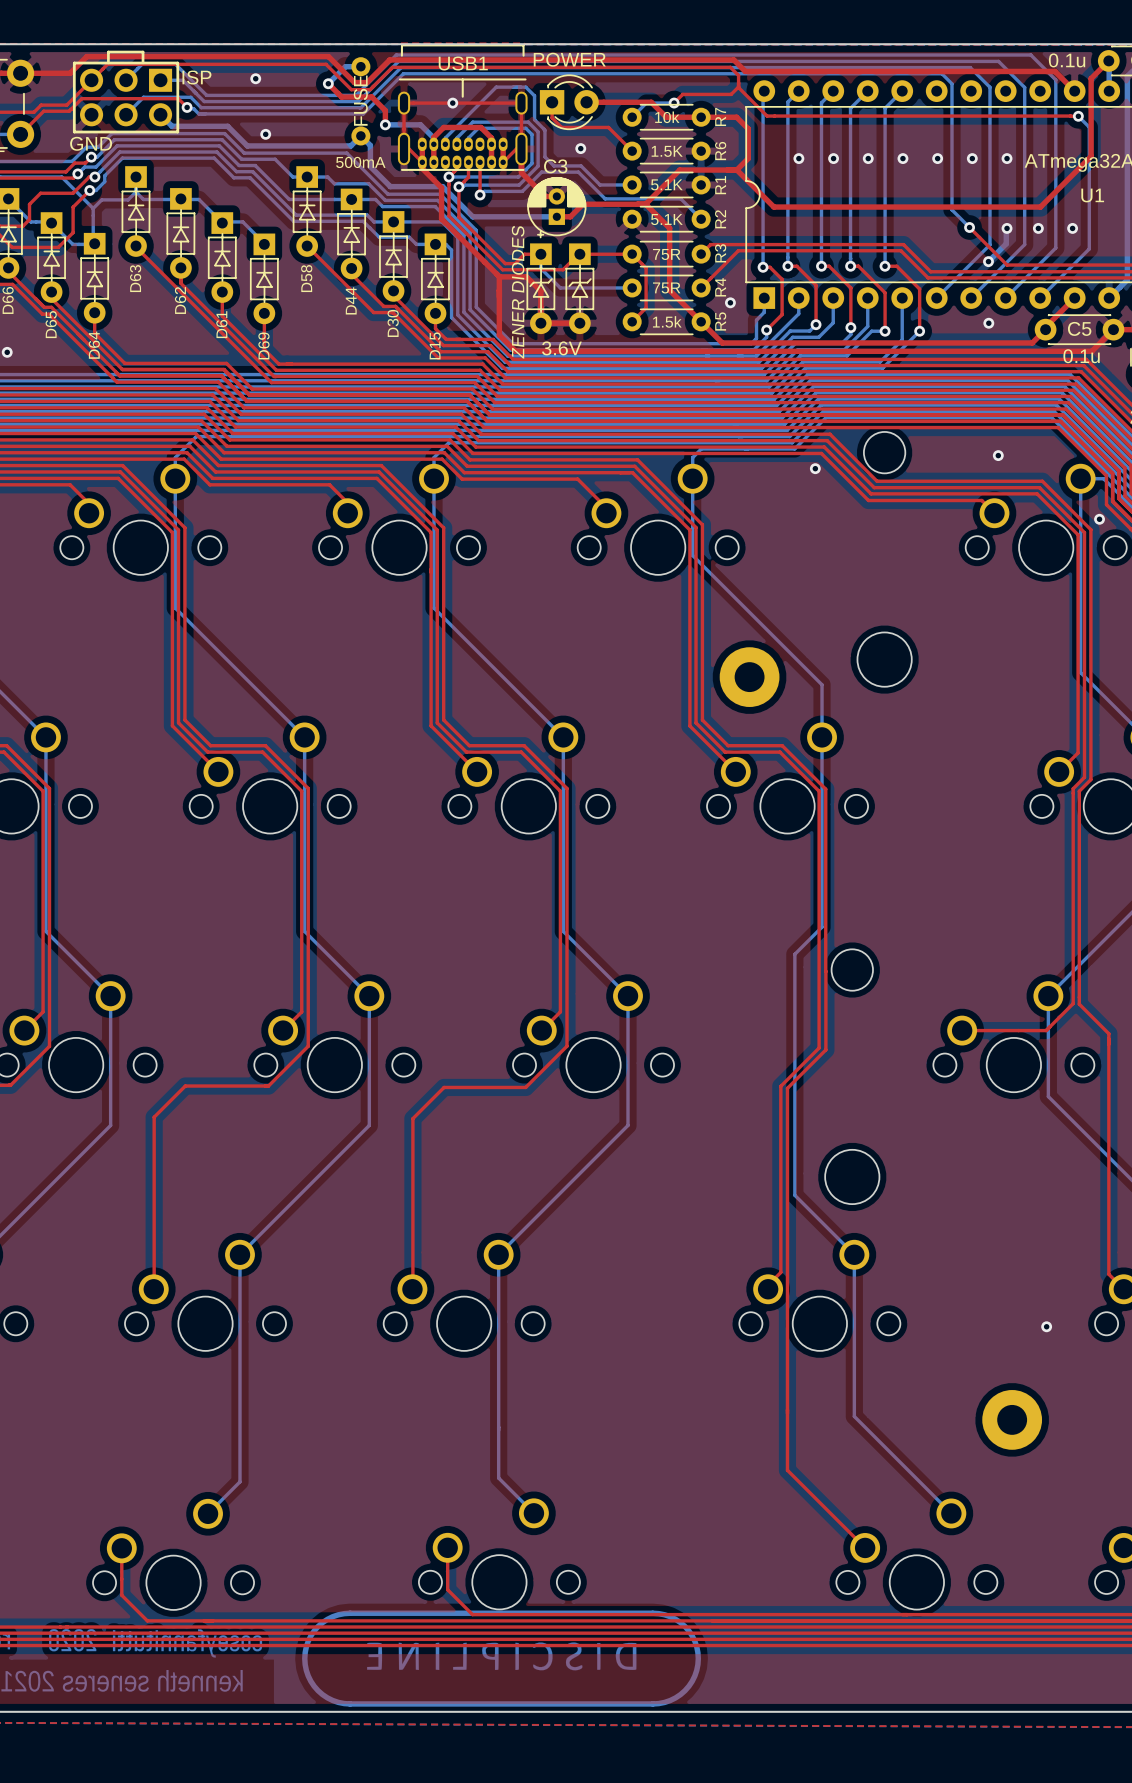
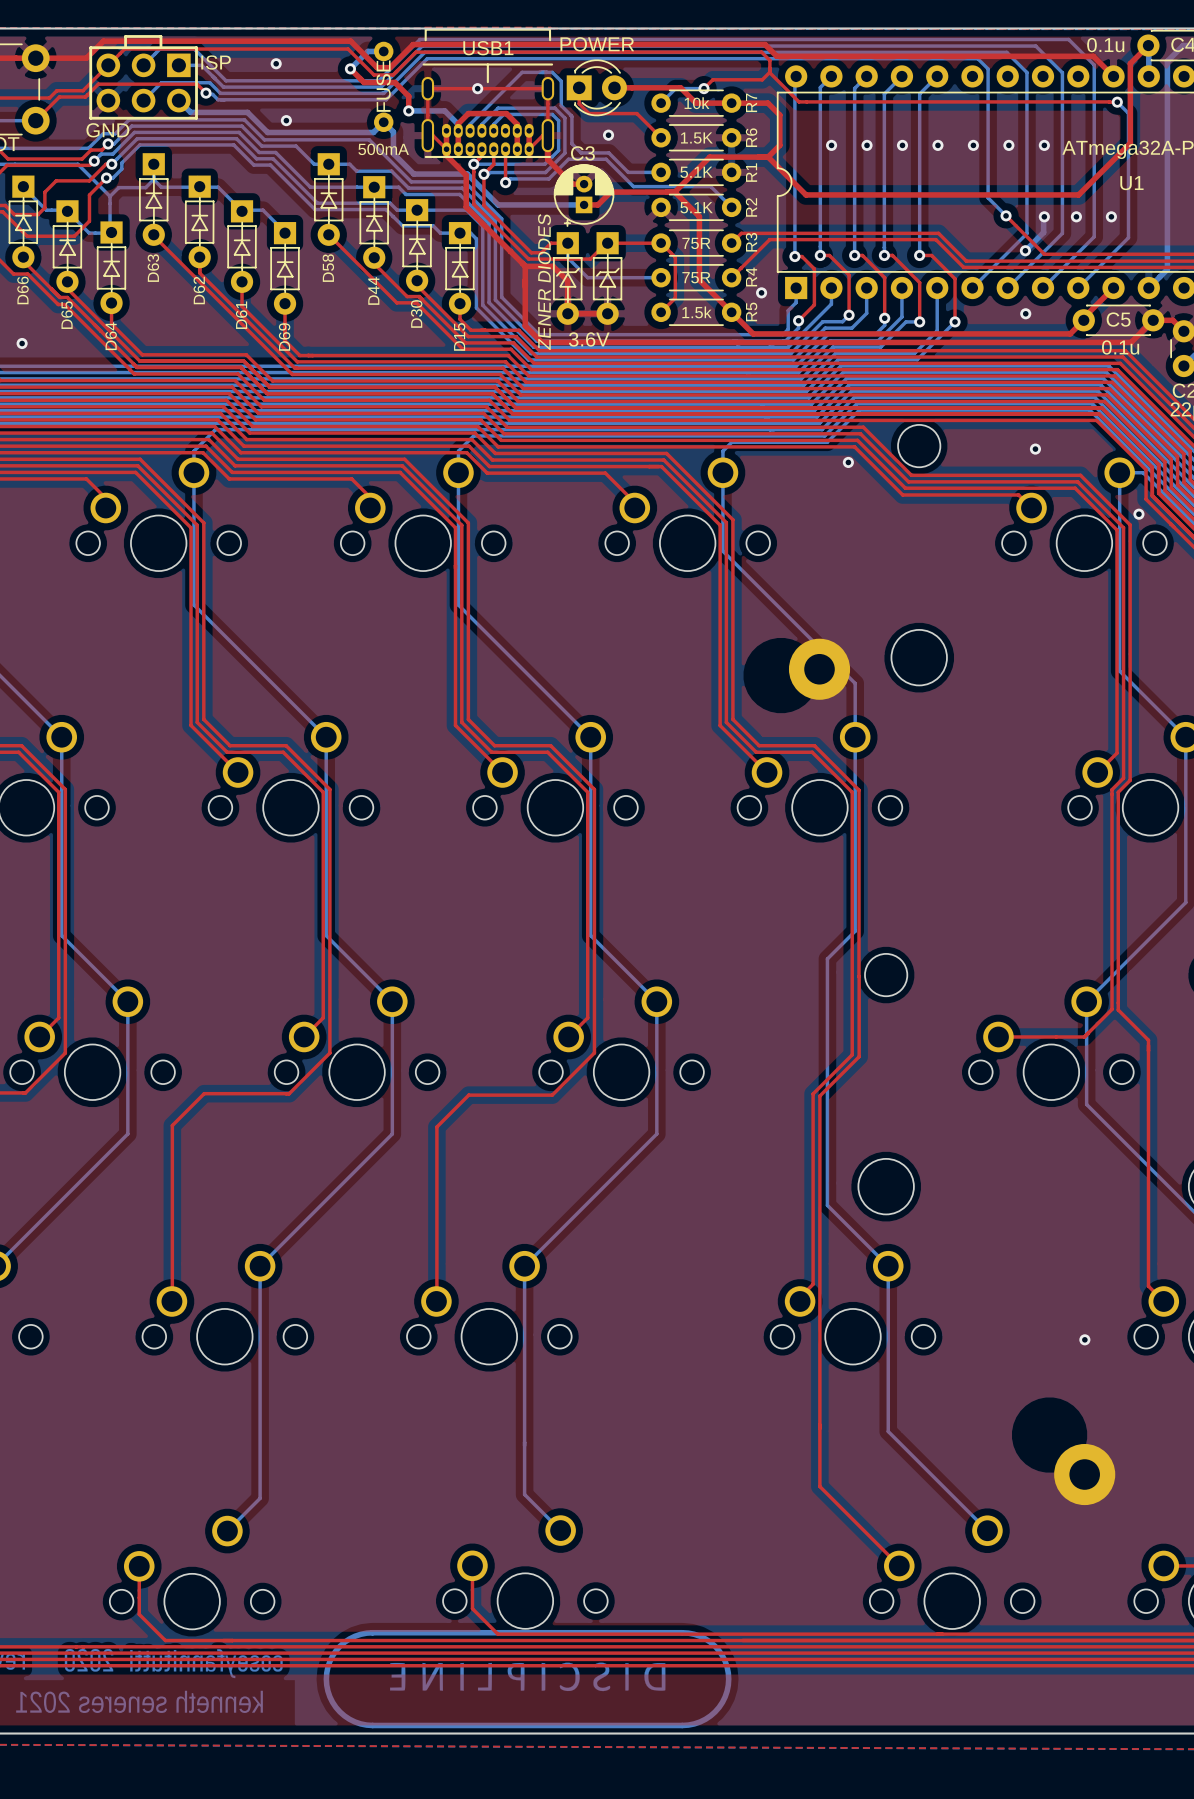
part position: (749, 677) -> (819, 669)
part position: (1012, 1419) -> (1084, 1474)

